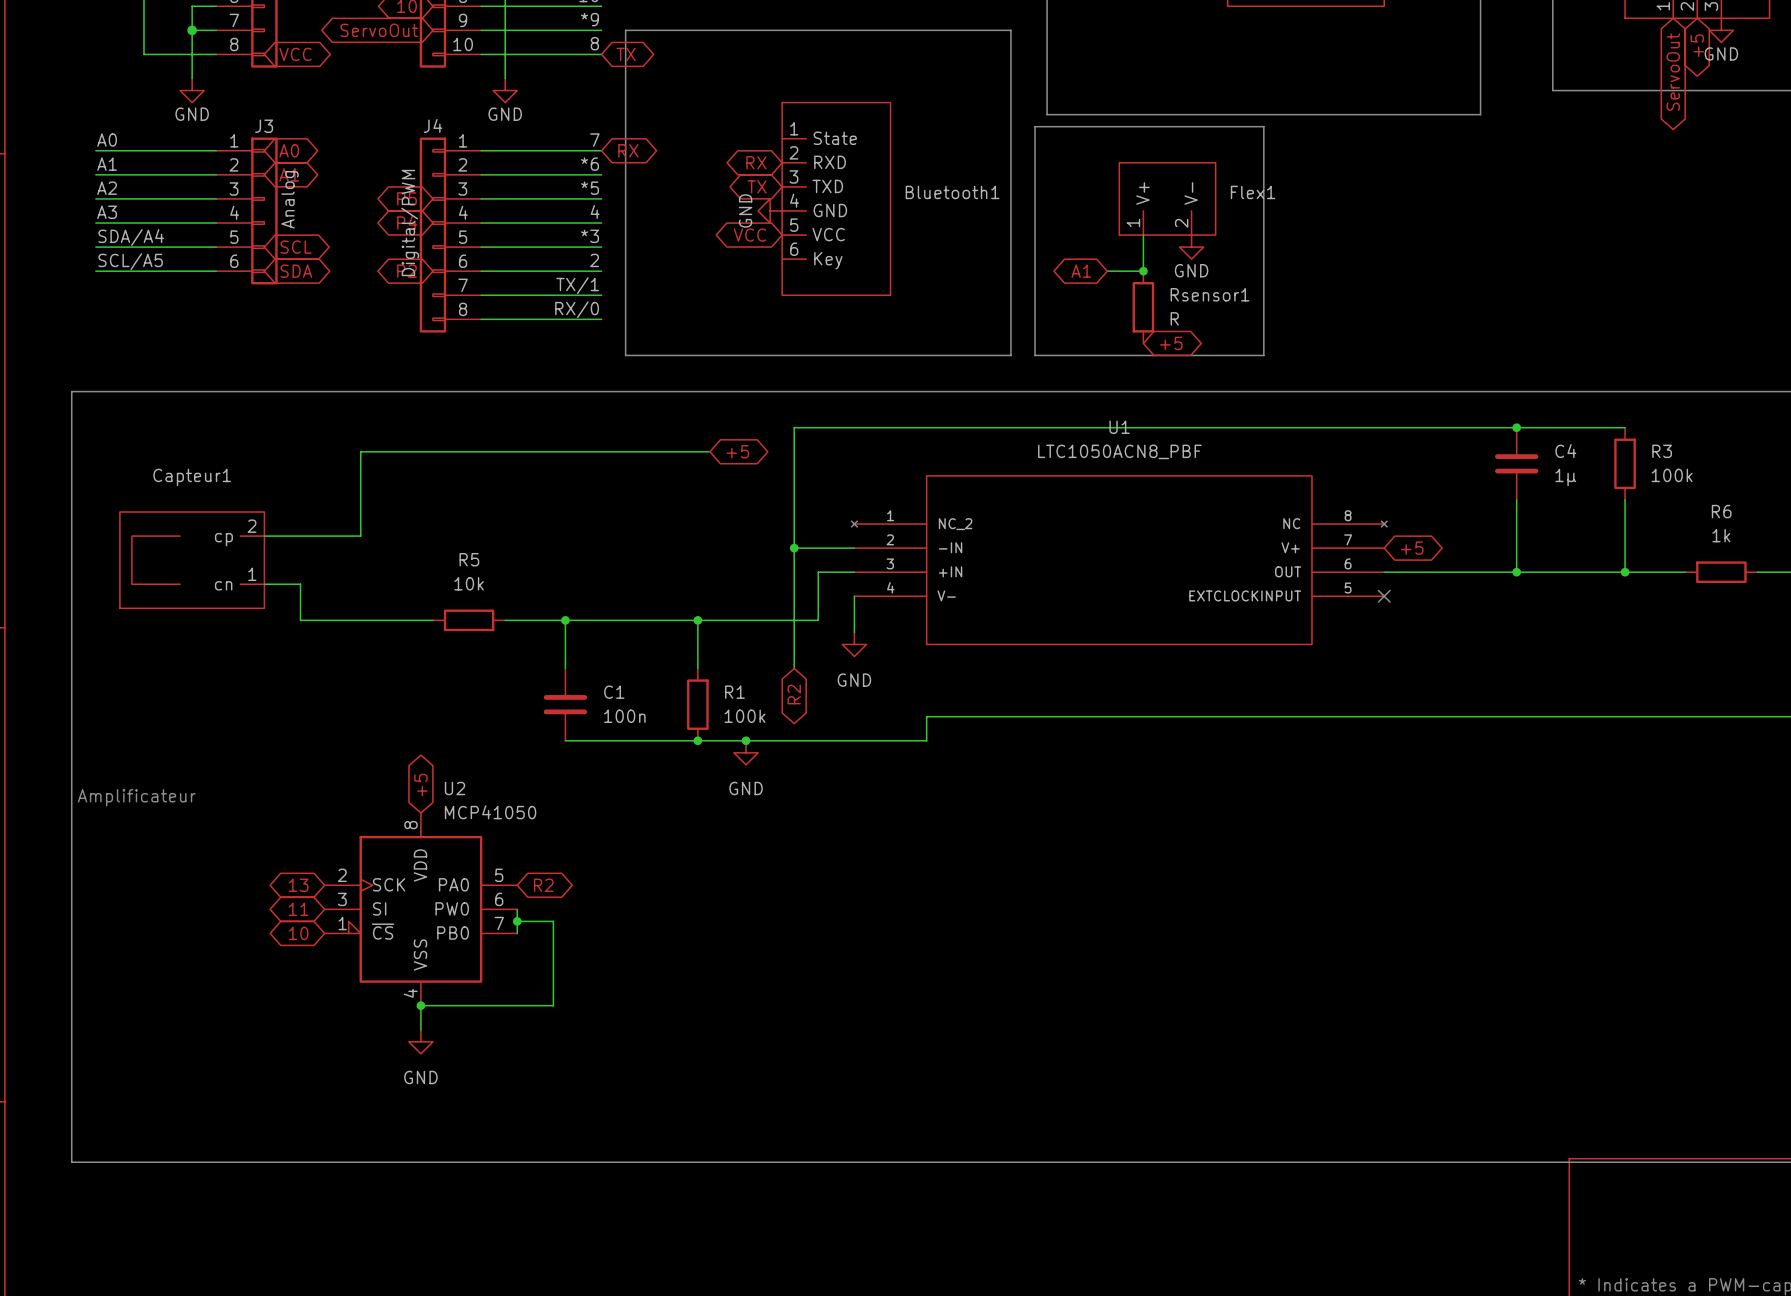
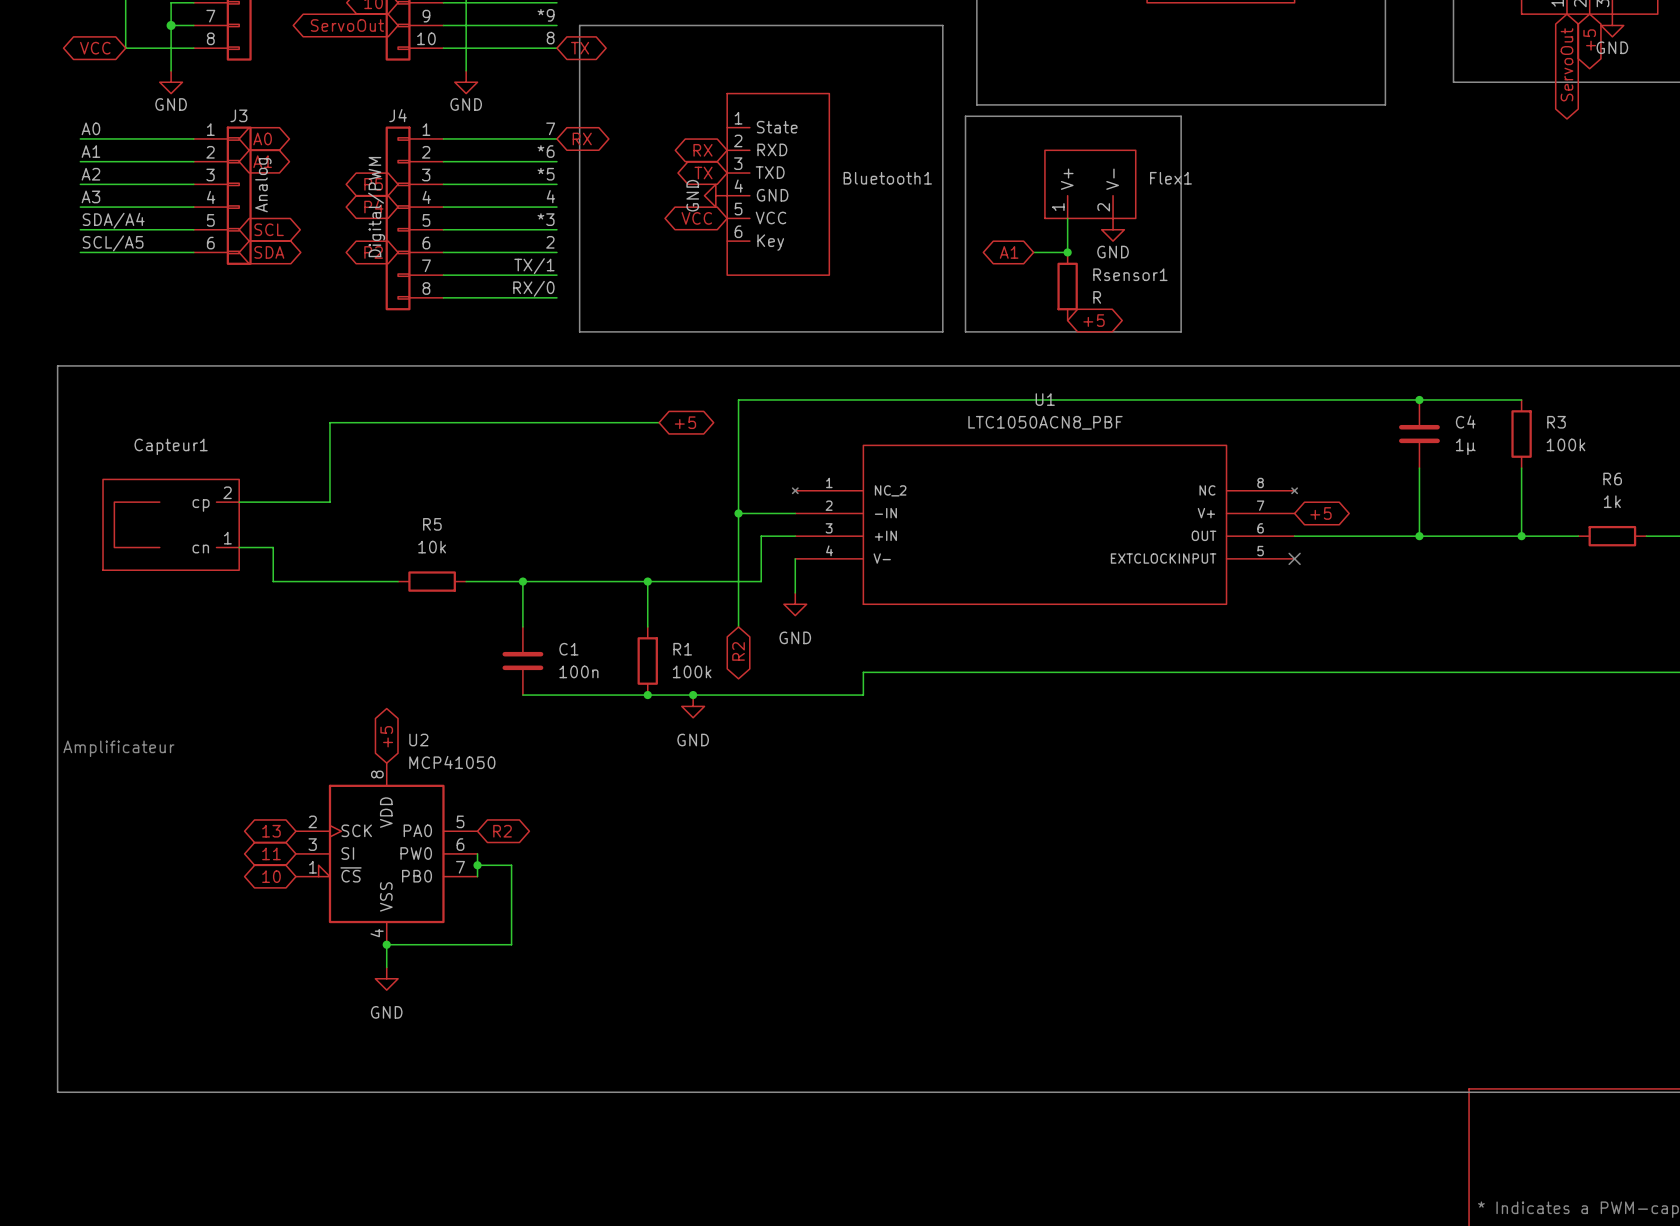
global label rotation: 0° (295, 54) -> 180° (95, 48)
global label position: VCC (295, 54) -> VCC (95, 48)

